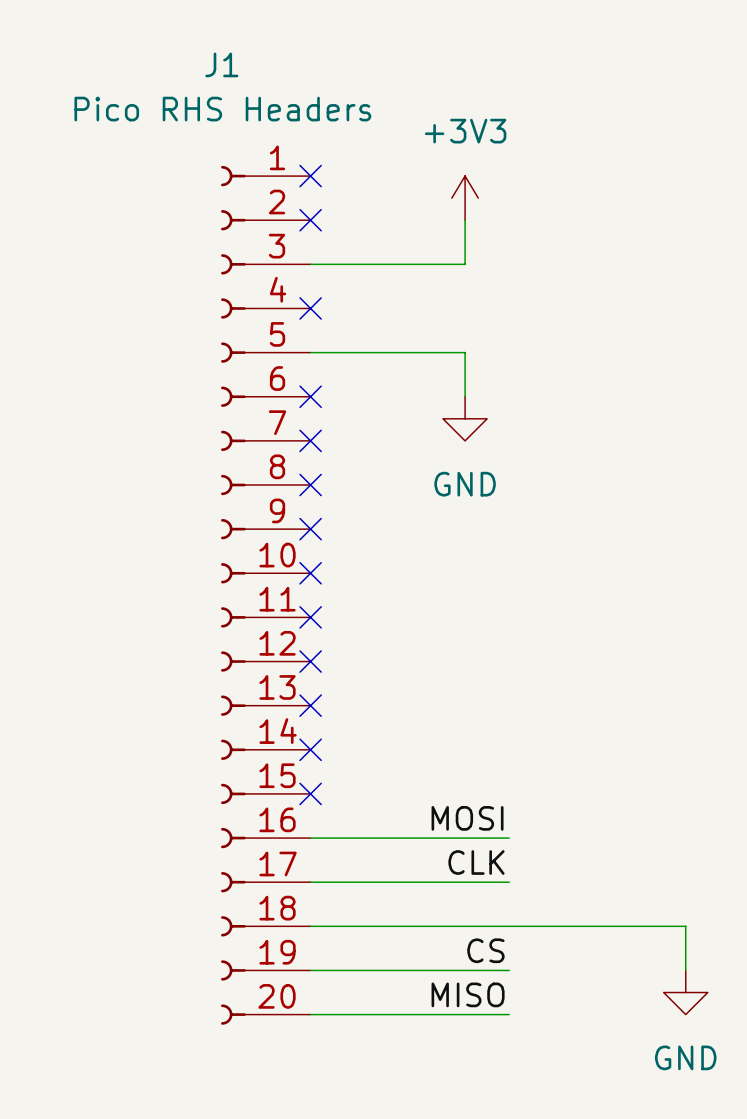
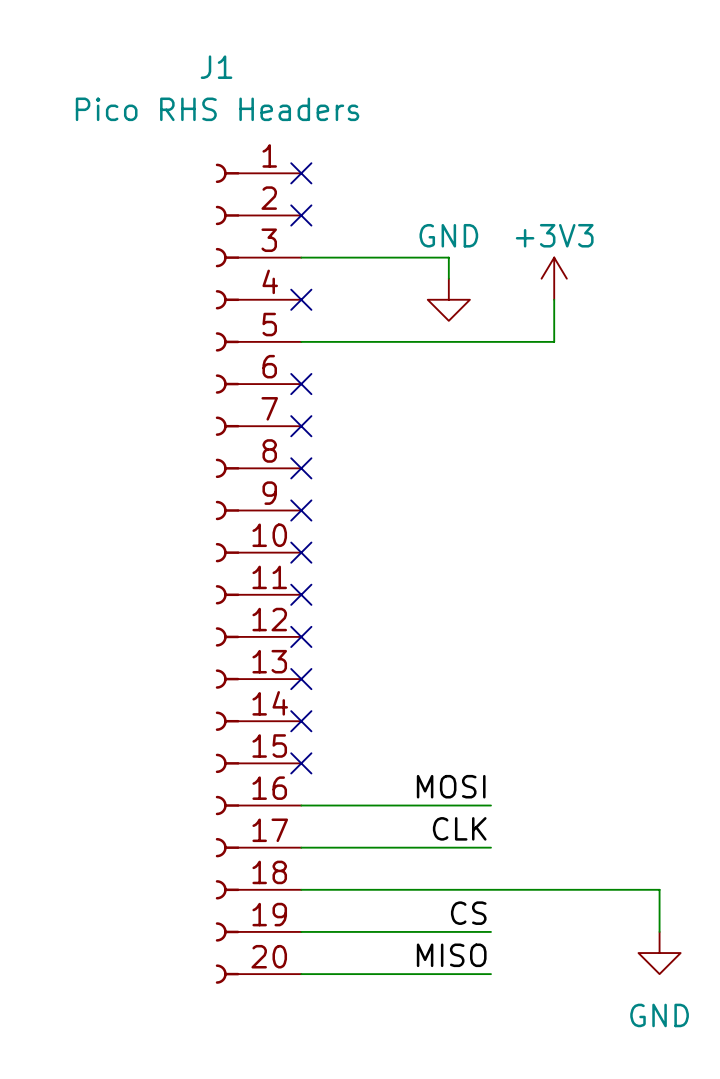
power symbol text position: +3V3 (465, 131) -> +3V3 (554, 235)
power symbol position: +3V3 (465, 198) -> +3V3 (554, 278)
wire: (465, 220) (465, 264) -> (448, 278) (448, 257)
wire: (465, 352) (465, 396) -> (448, 341) (554, 341) (554, 299)
power symbol position: GND (465, 418) -> GND (448, 299)
power symbol text position: GND (465, 484) -> GND (448, 235)

